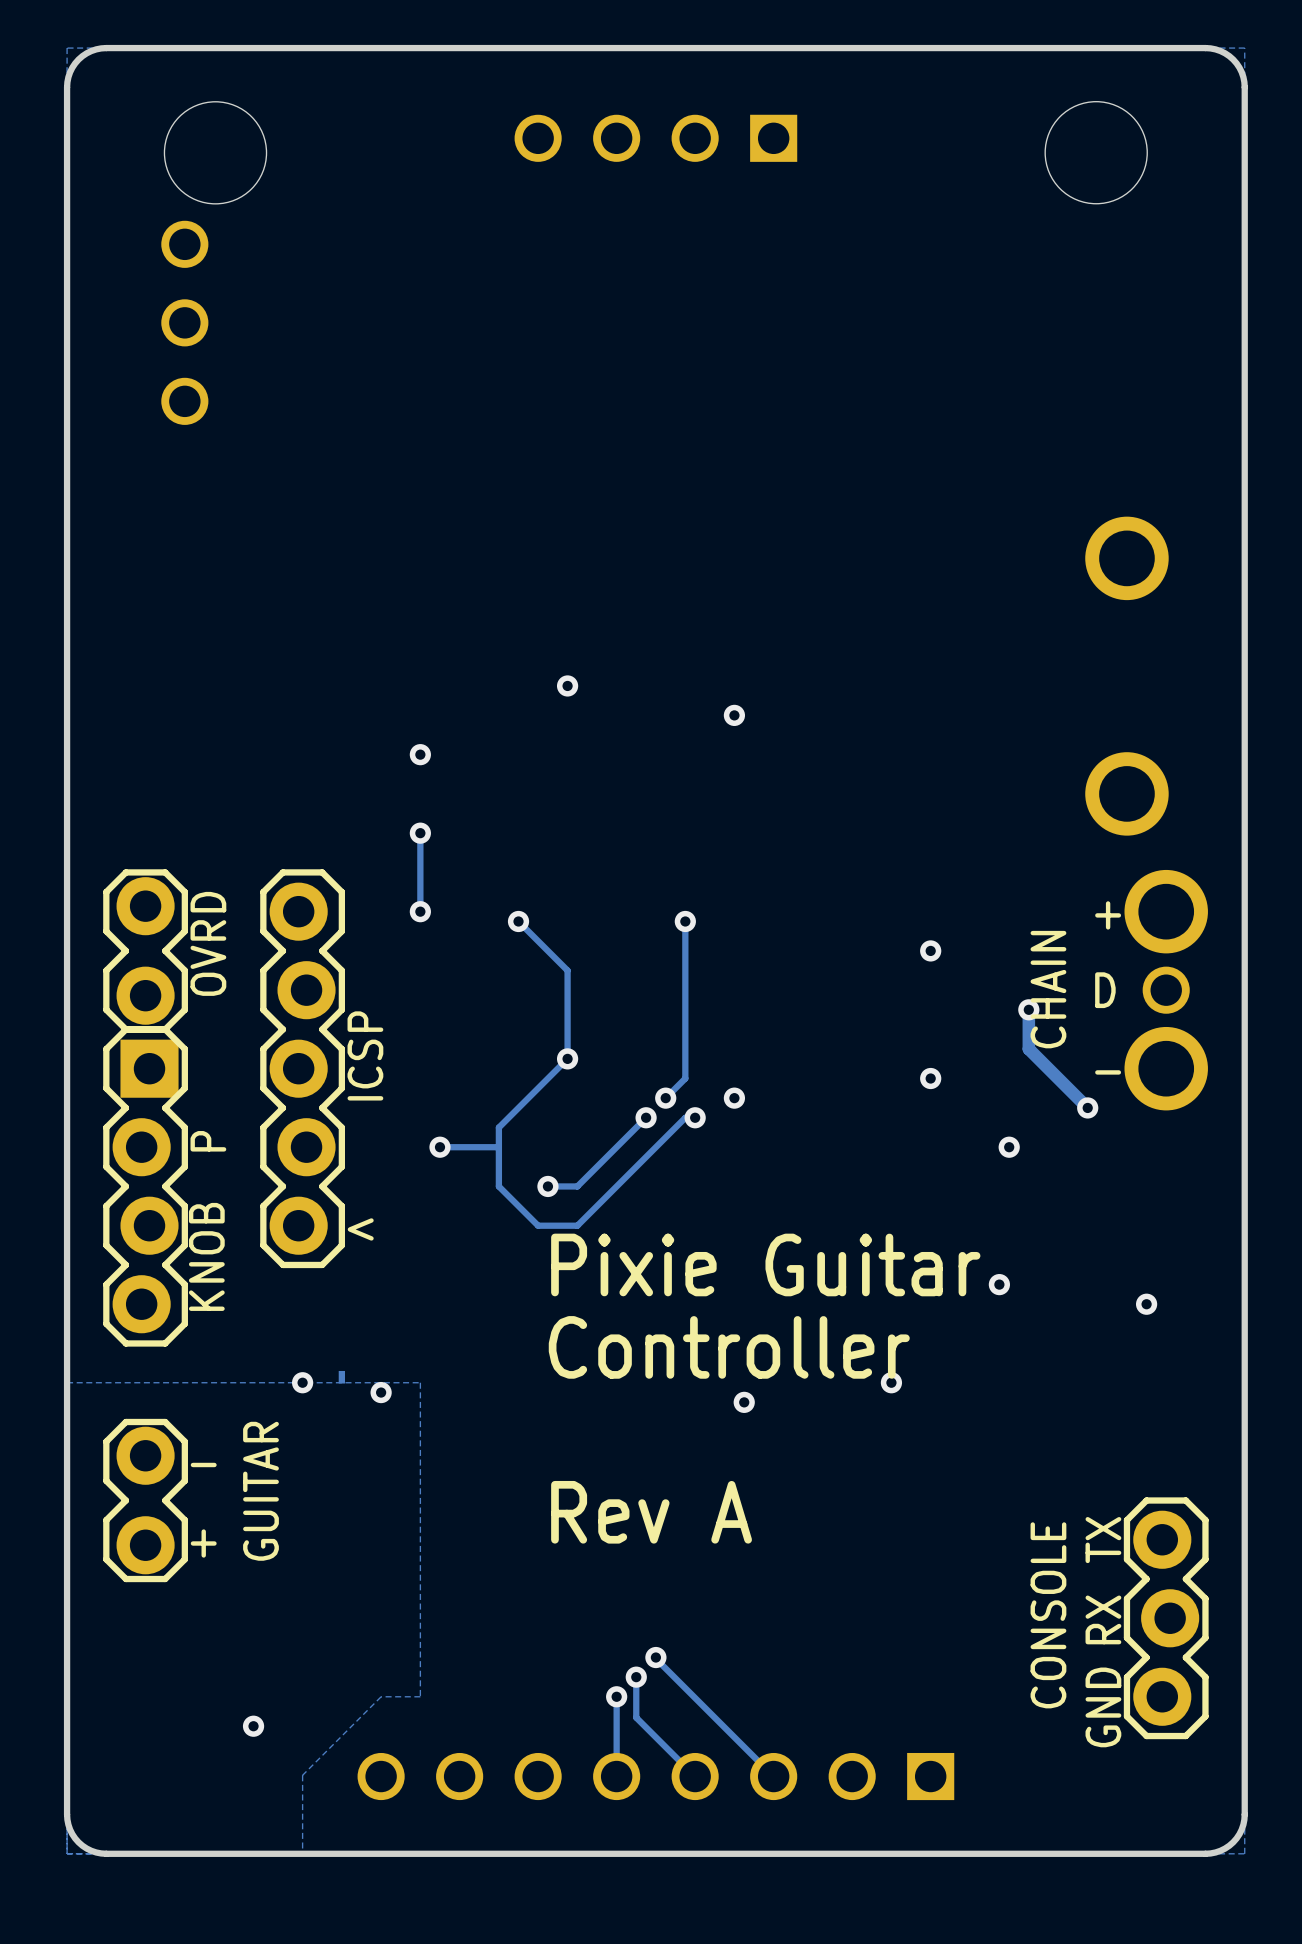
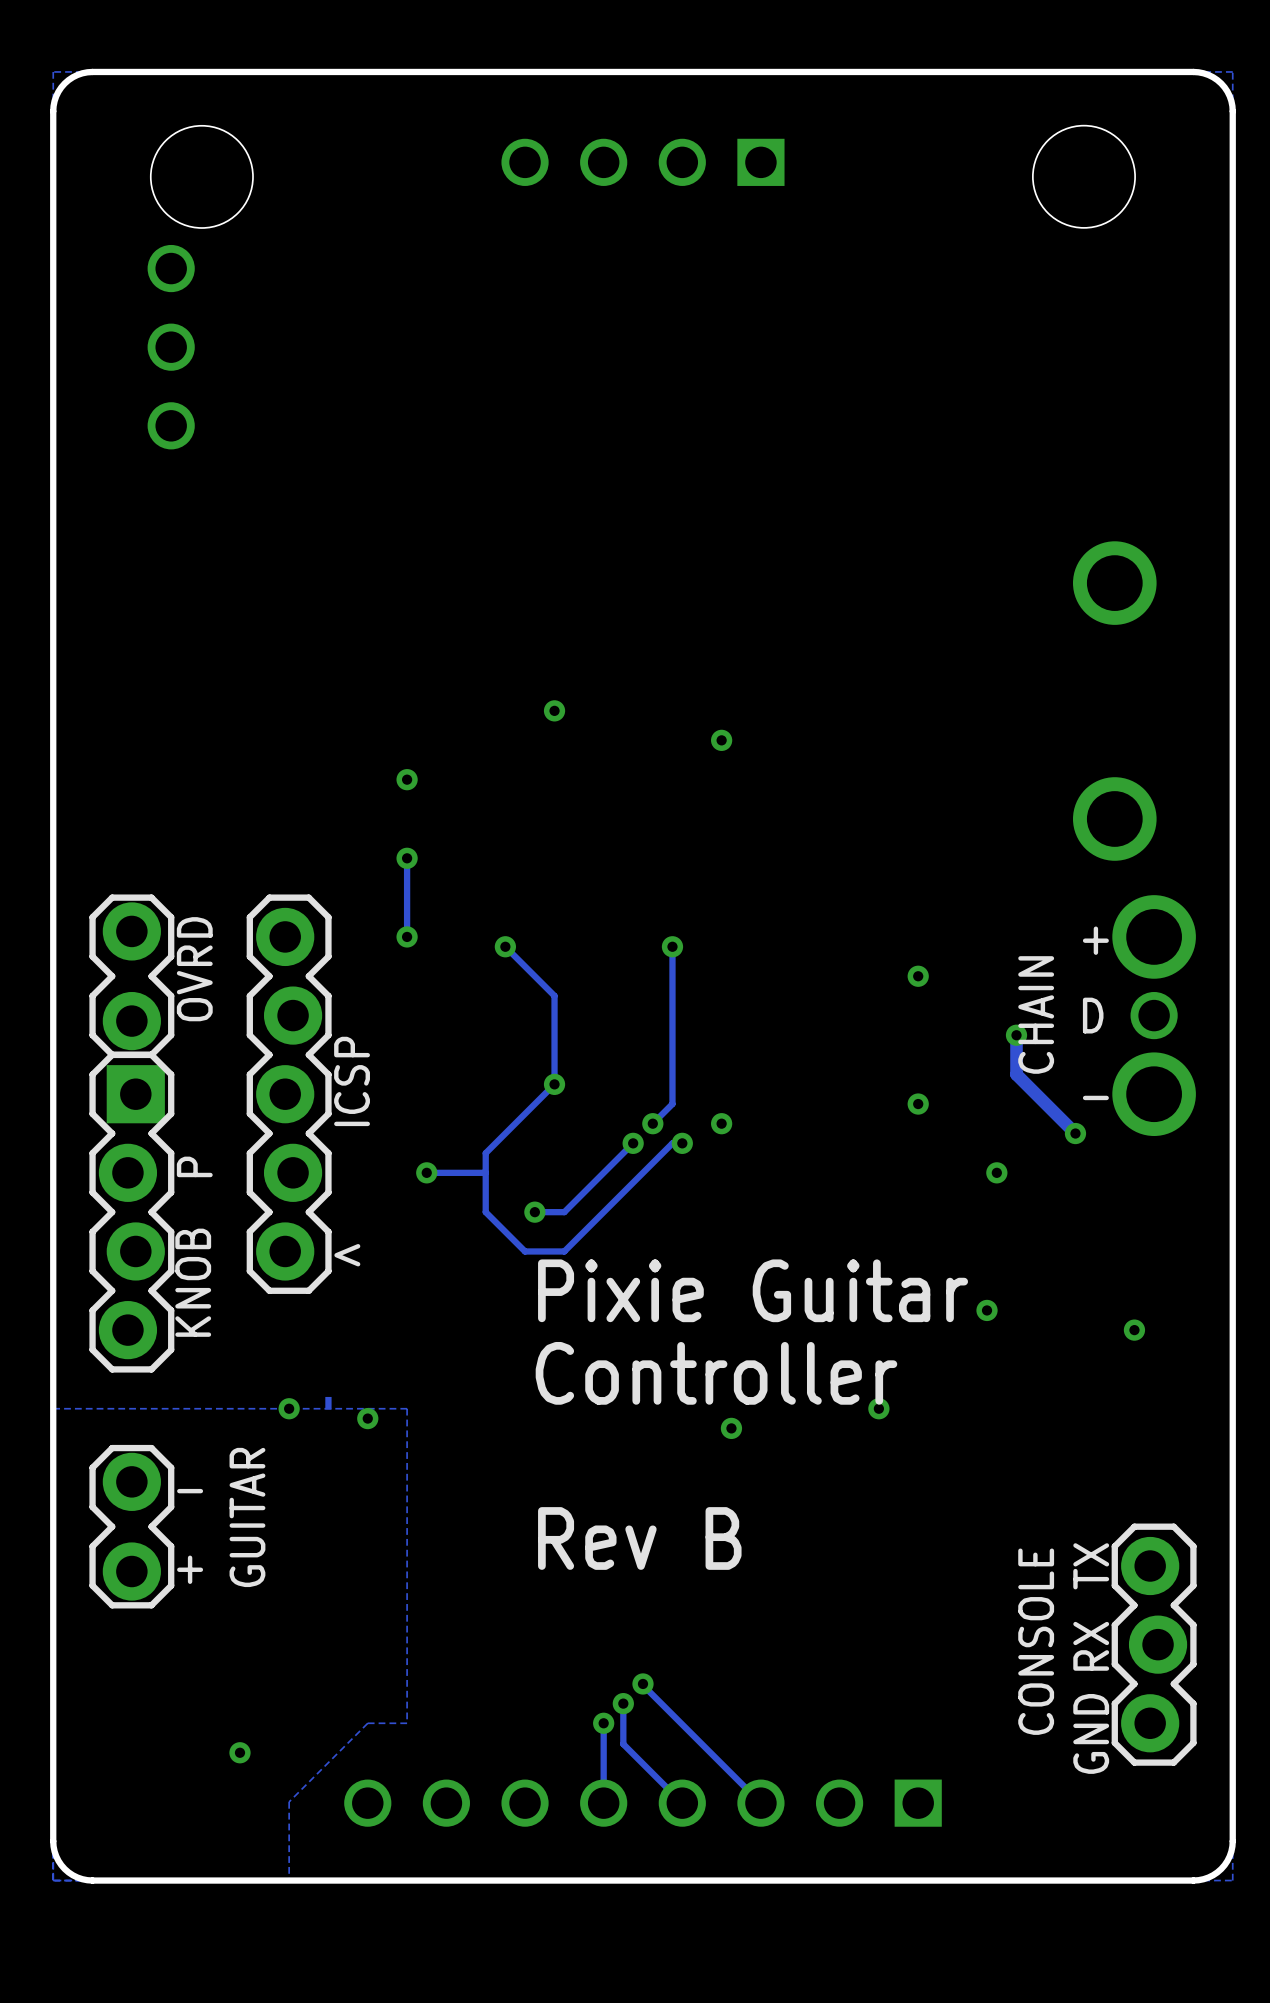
text: Rev A (651, 1512) -> Rev B (639, 1538)

